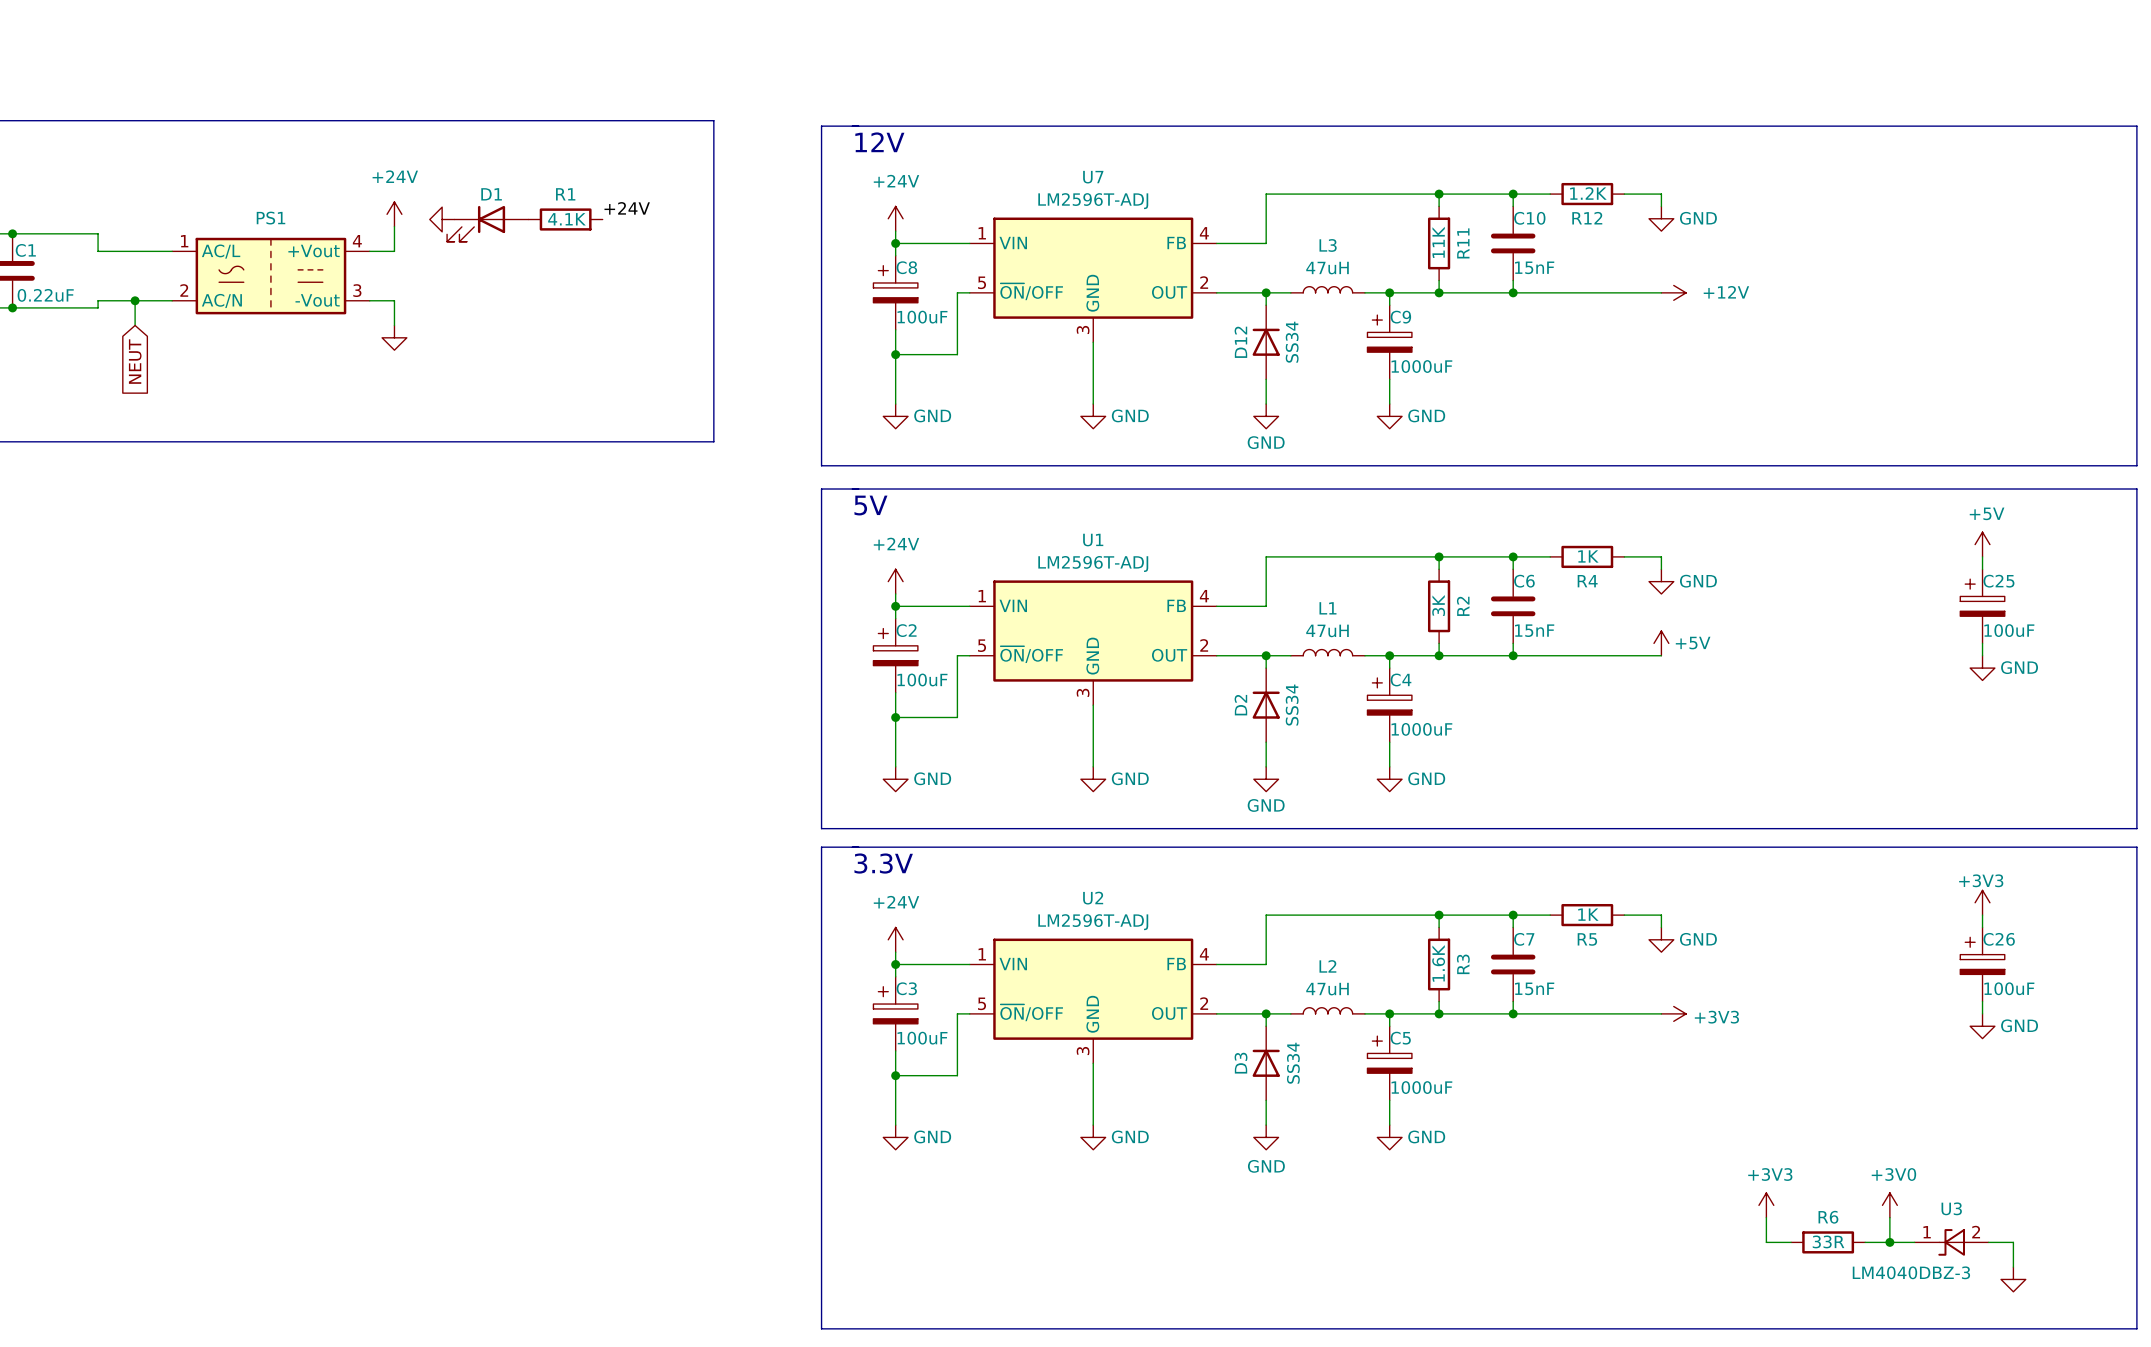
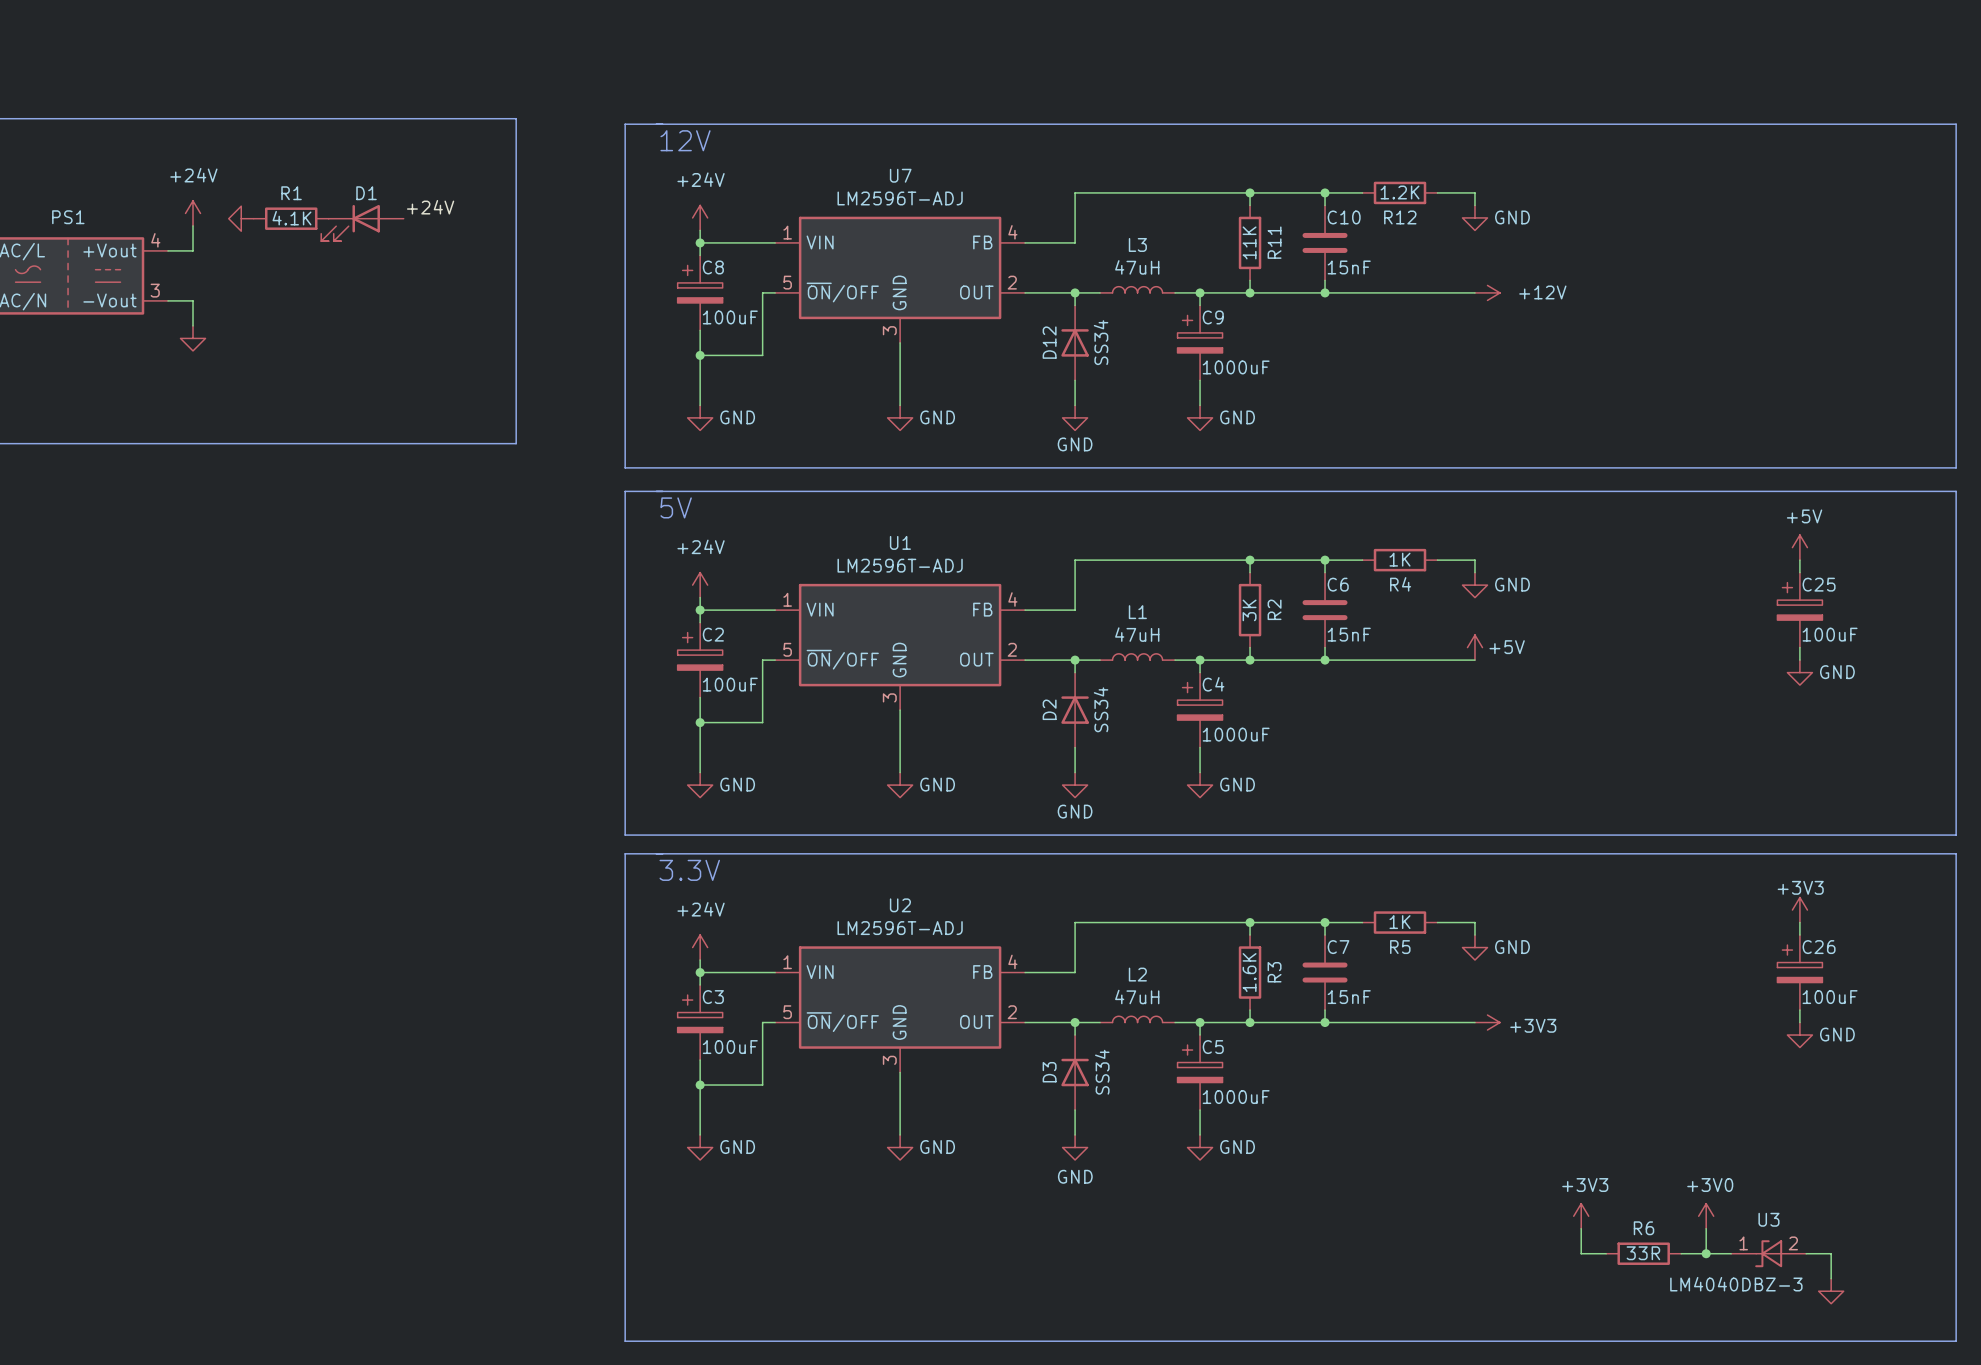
R1 position: (565, 219) -> (291, 218)
D1 position: (487, 223) -> (362, 223)

